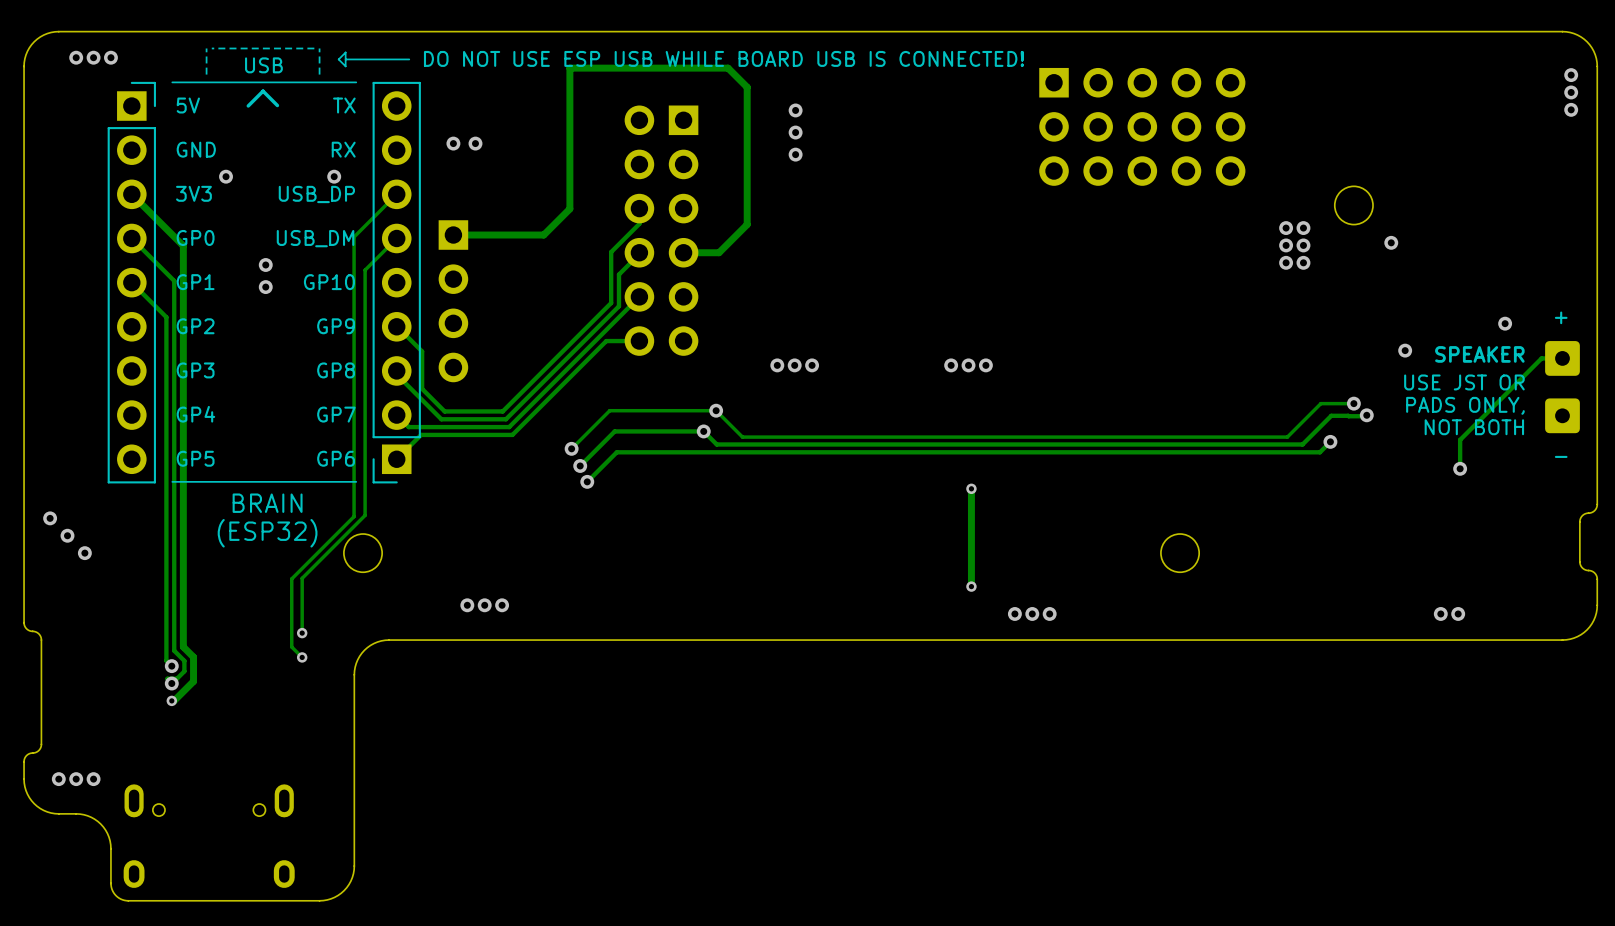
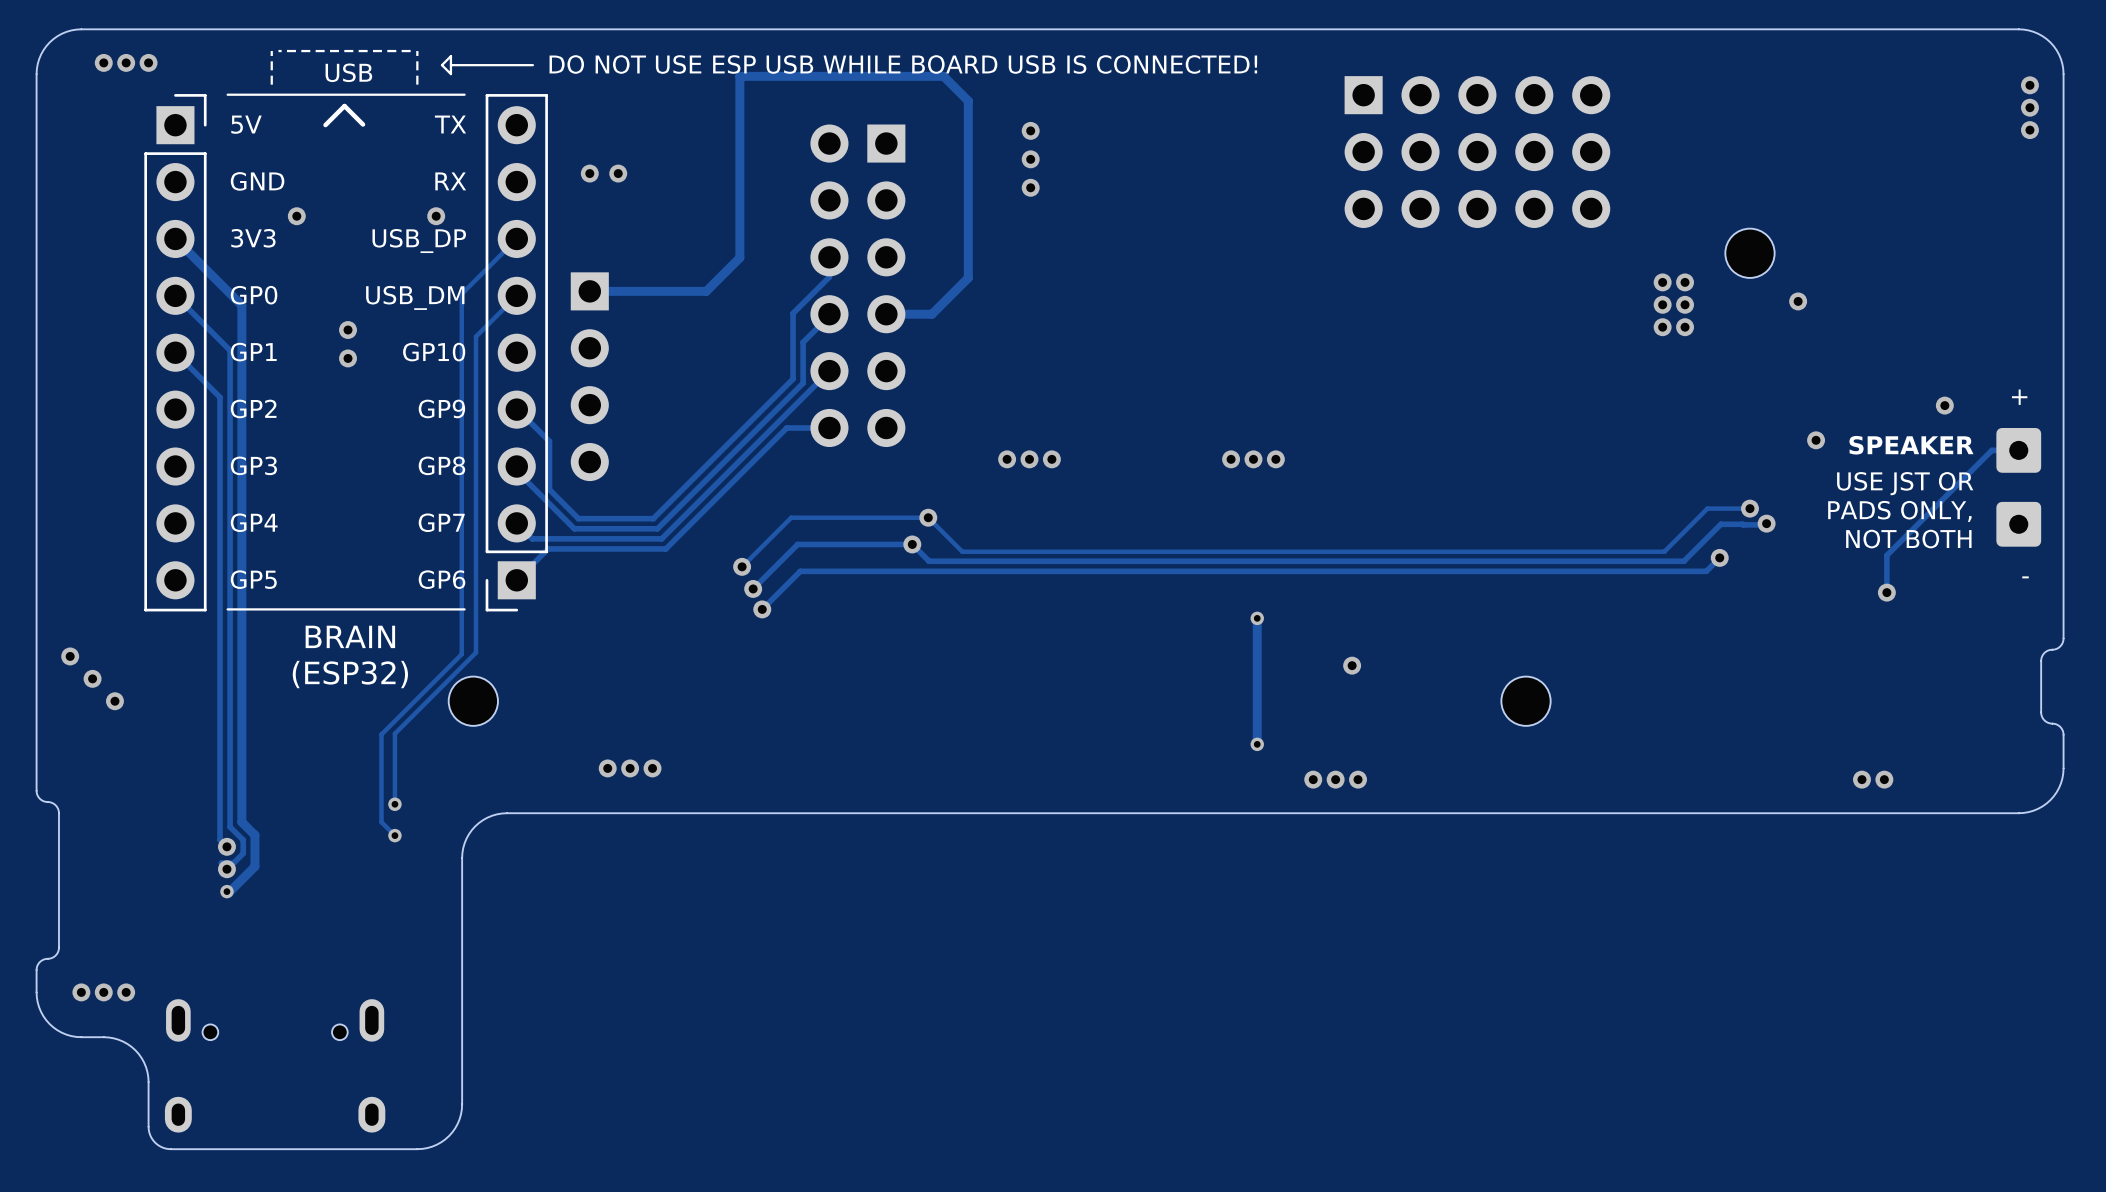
via: none -> (1352, 665)

